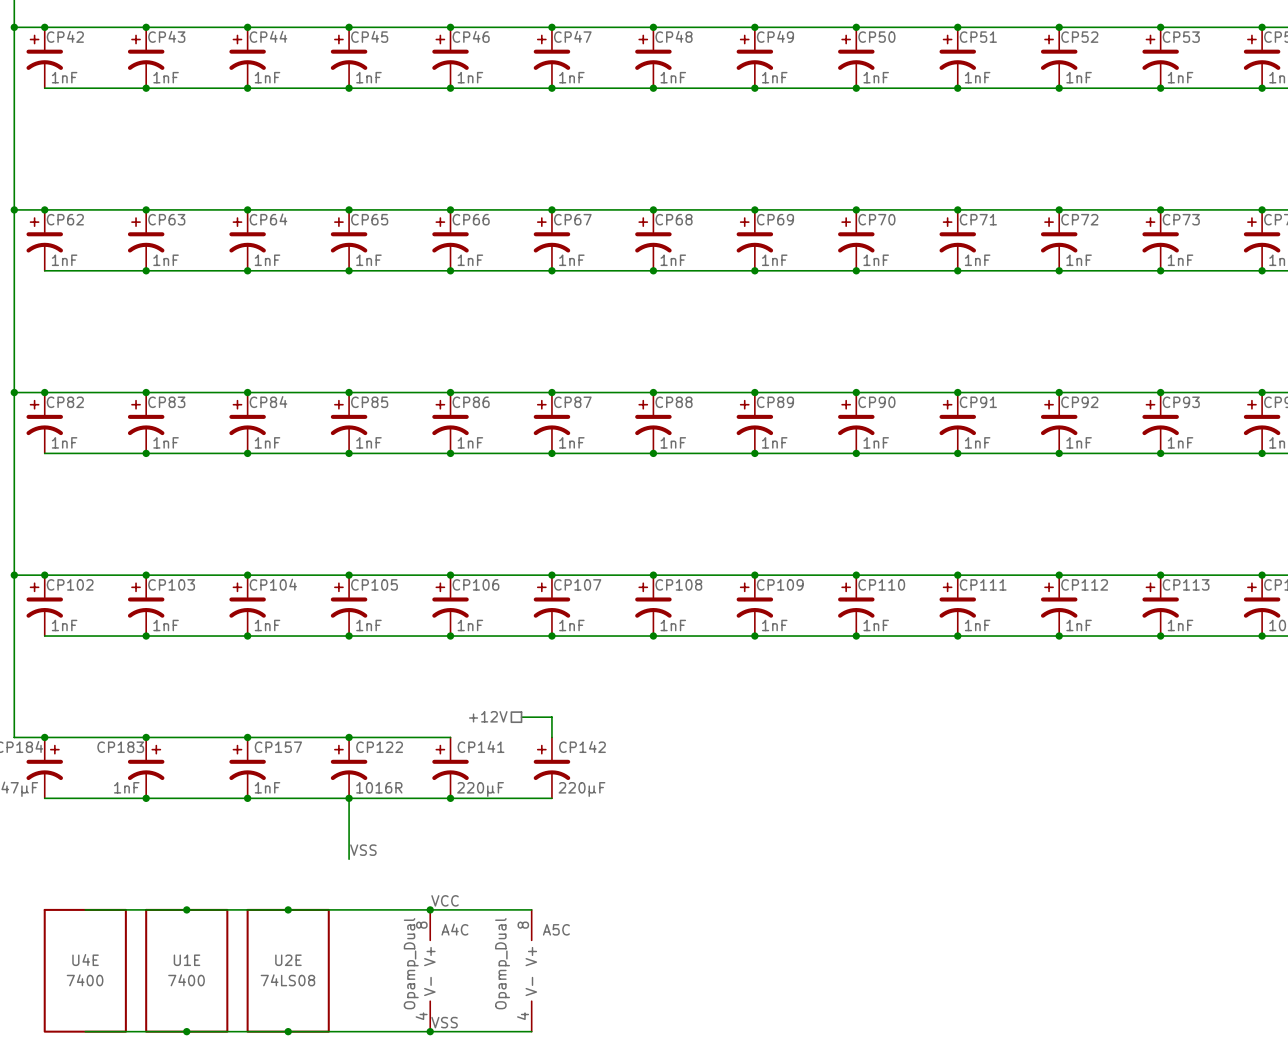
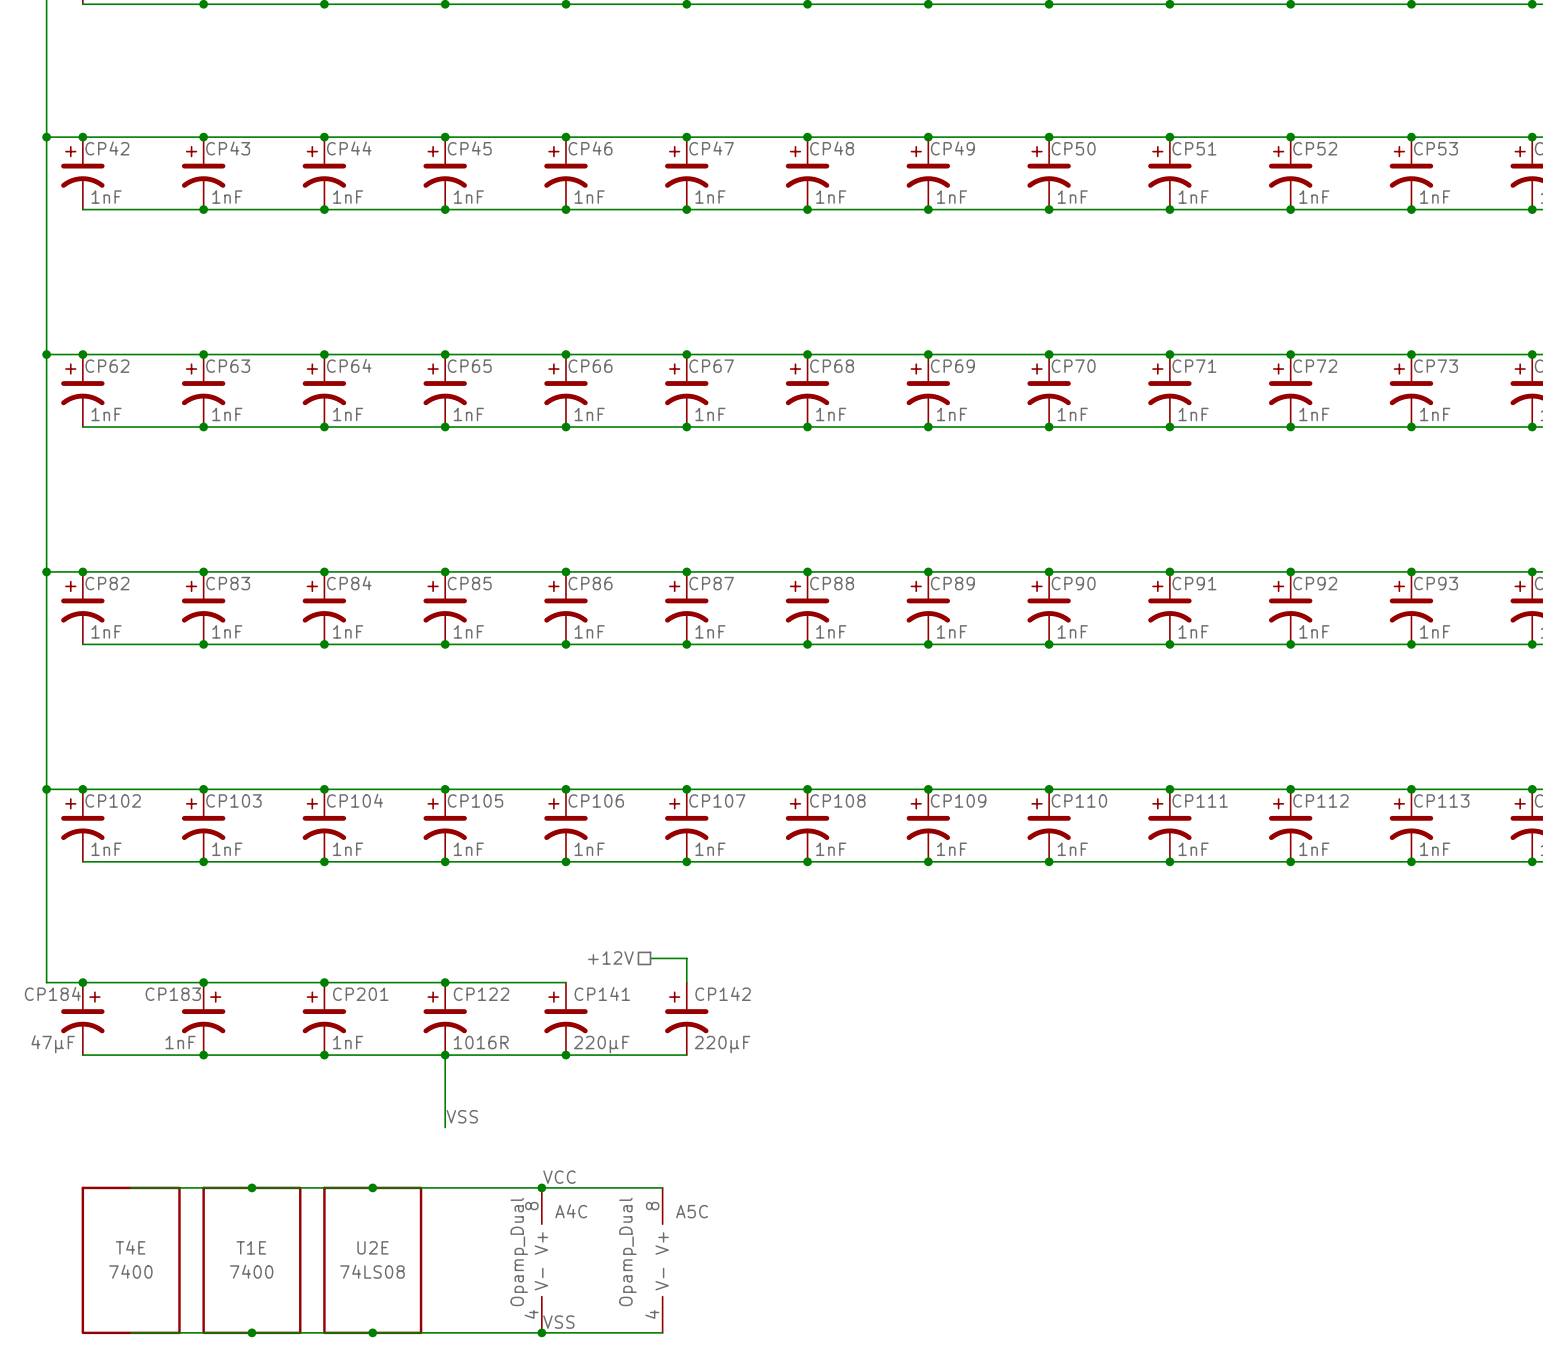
CP157 name: CP157 (278, 747) -> CP201 (360, 994)
U4E name: U4E (85, 960) -> T4E (130, 1247)
U1E name: U1E (186, 960) -> T1E (251, 1247)

